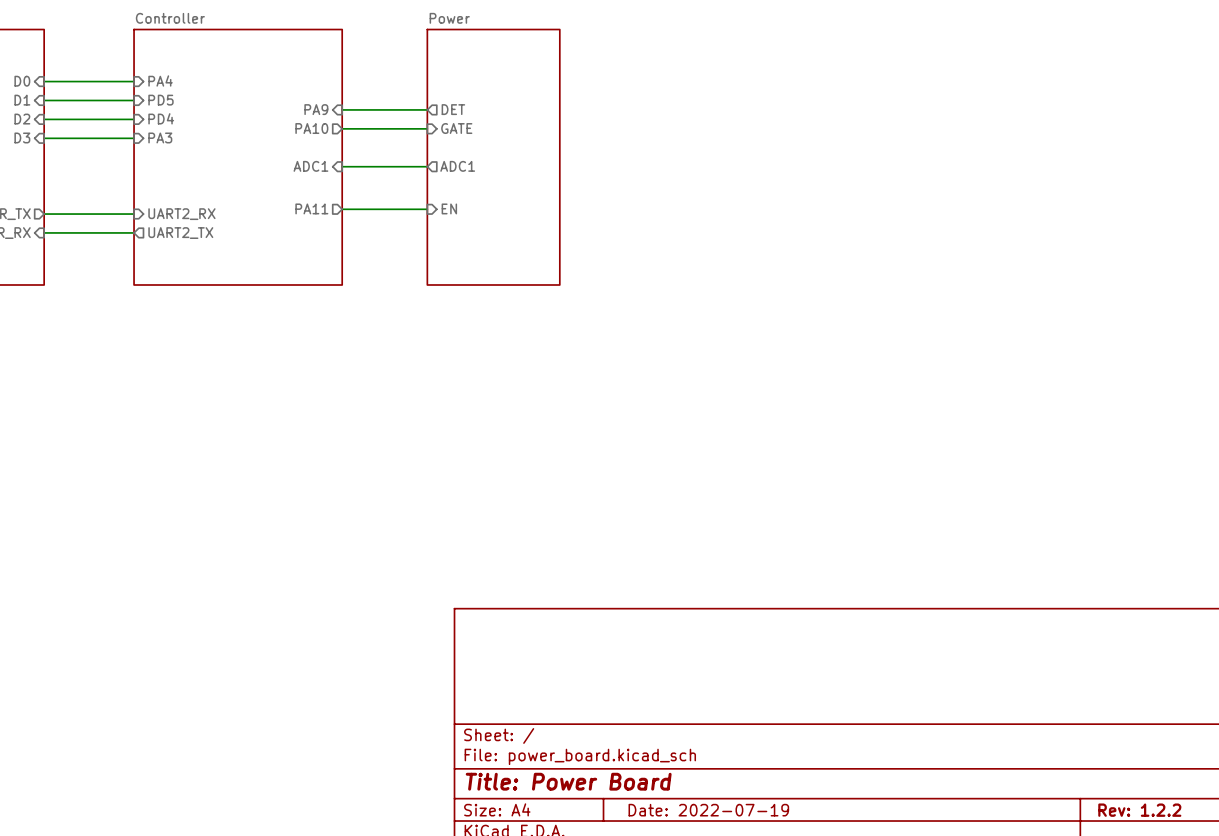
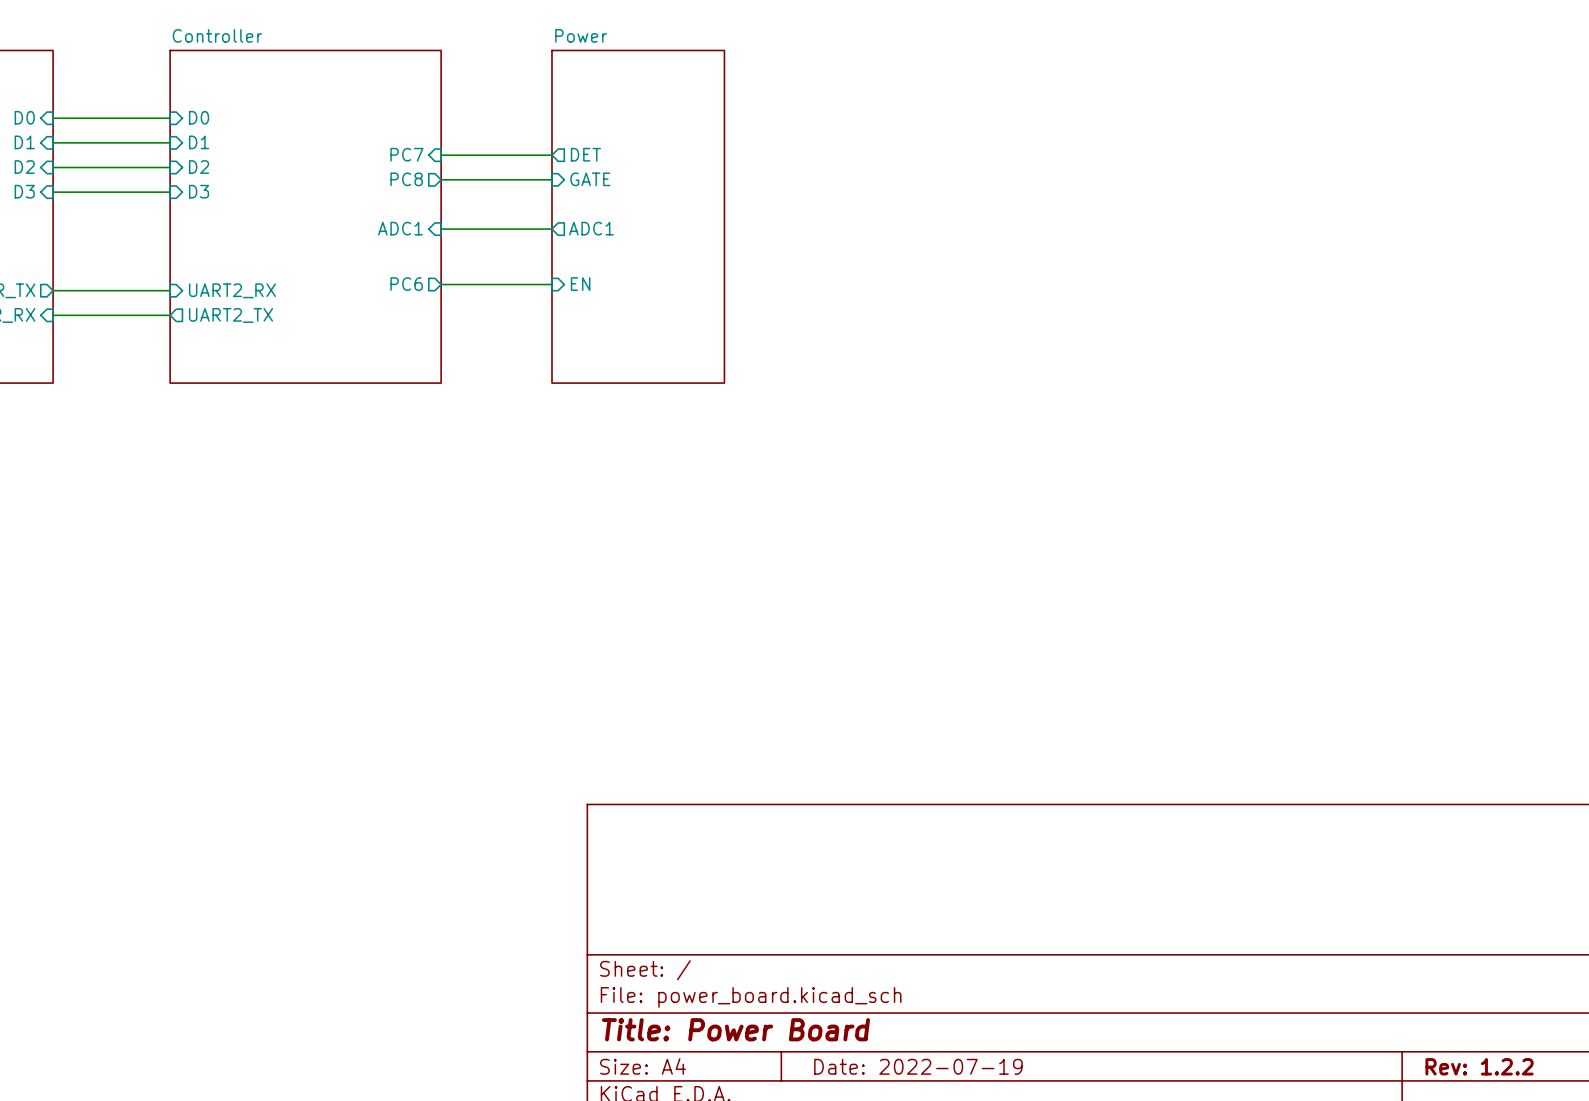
sheet pin: PA4 (160, 80) -> D0 (199, 117)
sheet pin: PD5 (160, 100) -> D1 (199, 142)
sheet pin: PA9 (316, 109) -> PC7 (406, 154)
sheet pin: PD4 (161, 118) -> D2 (199, 167)
sheet pin: PA10 (311, 128) -> PC8 (406, 179)
sheet pin: PA3 (160, 137) -> D3 (199, 191)
sheet pin: PA11 (311, 208) -> PC6 (406, 284)

